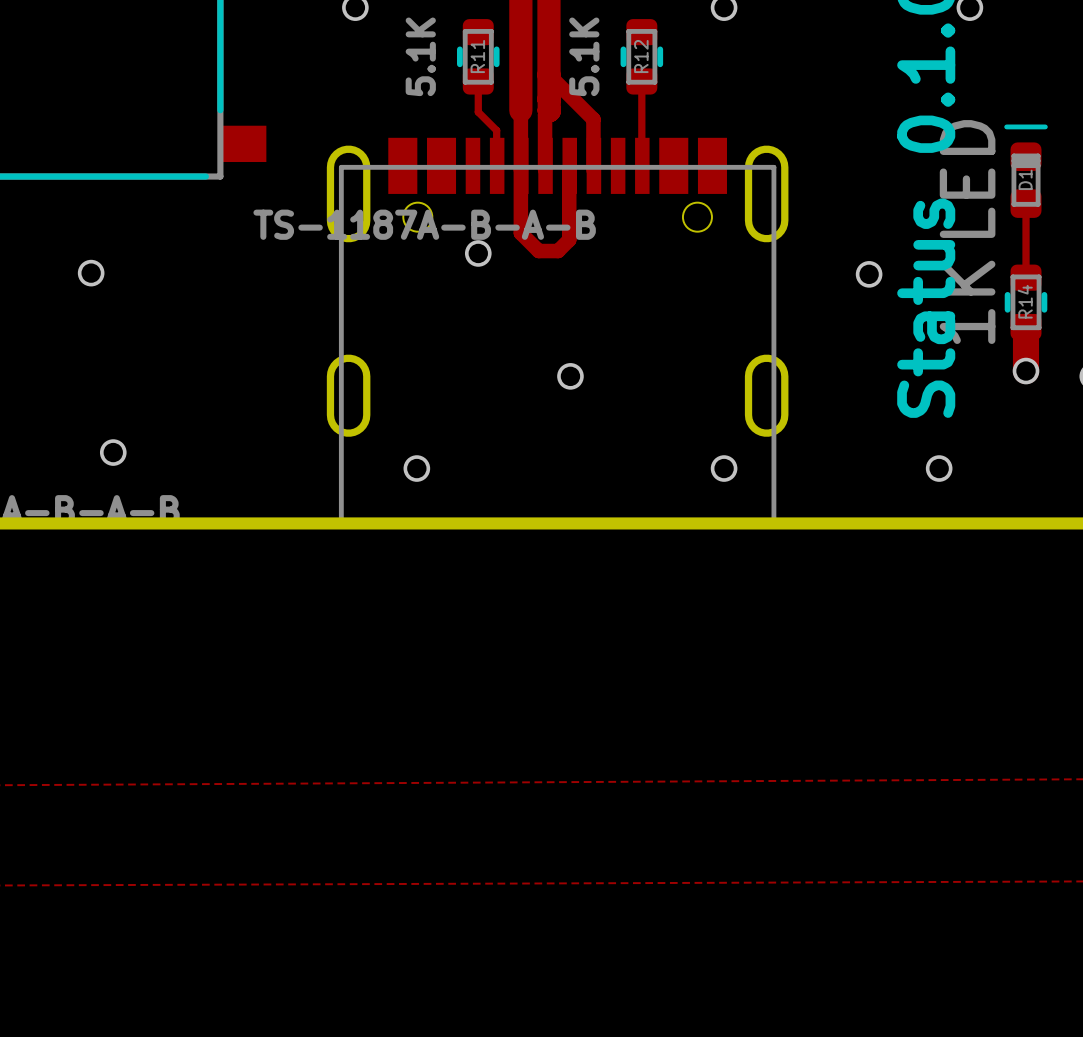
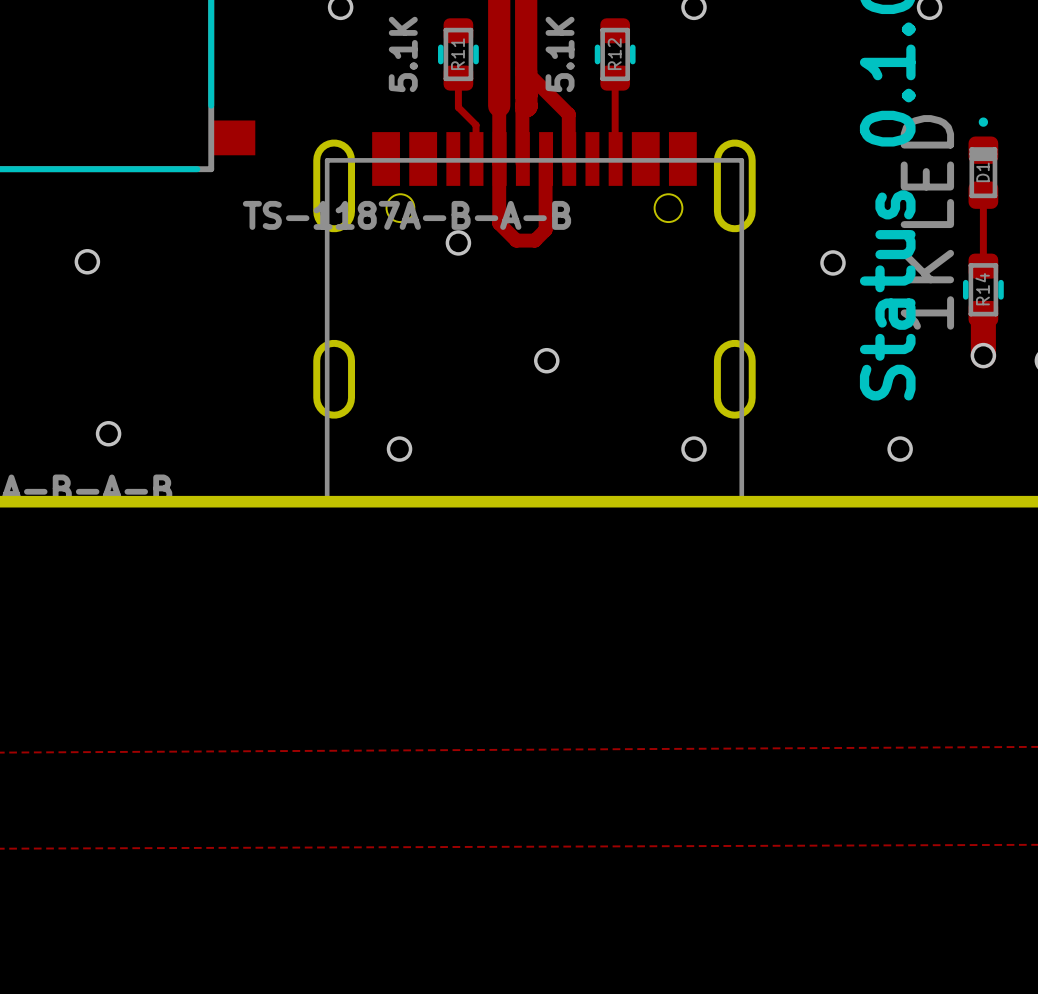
D1 footprint: [1004, 124, 1048, 218] -> [968, 117, 999, 209]

